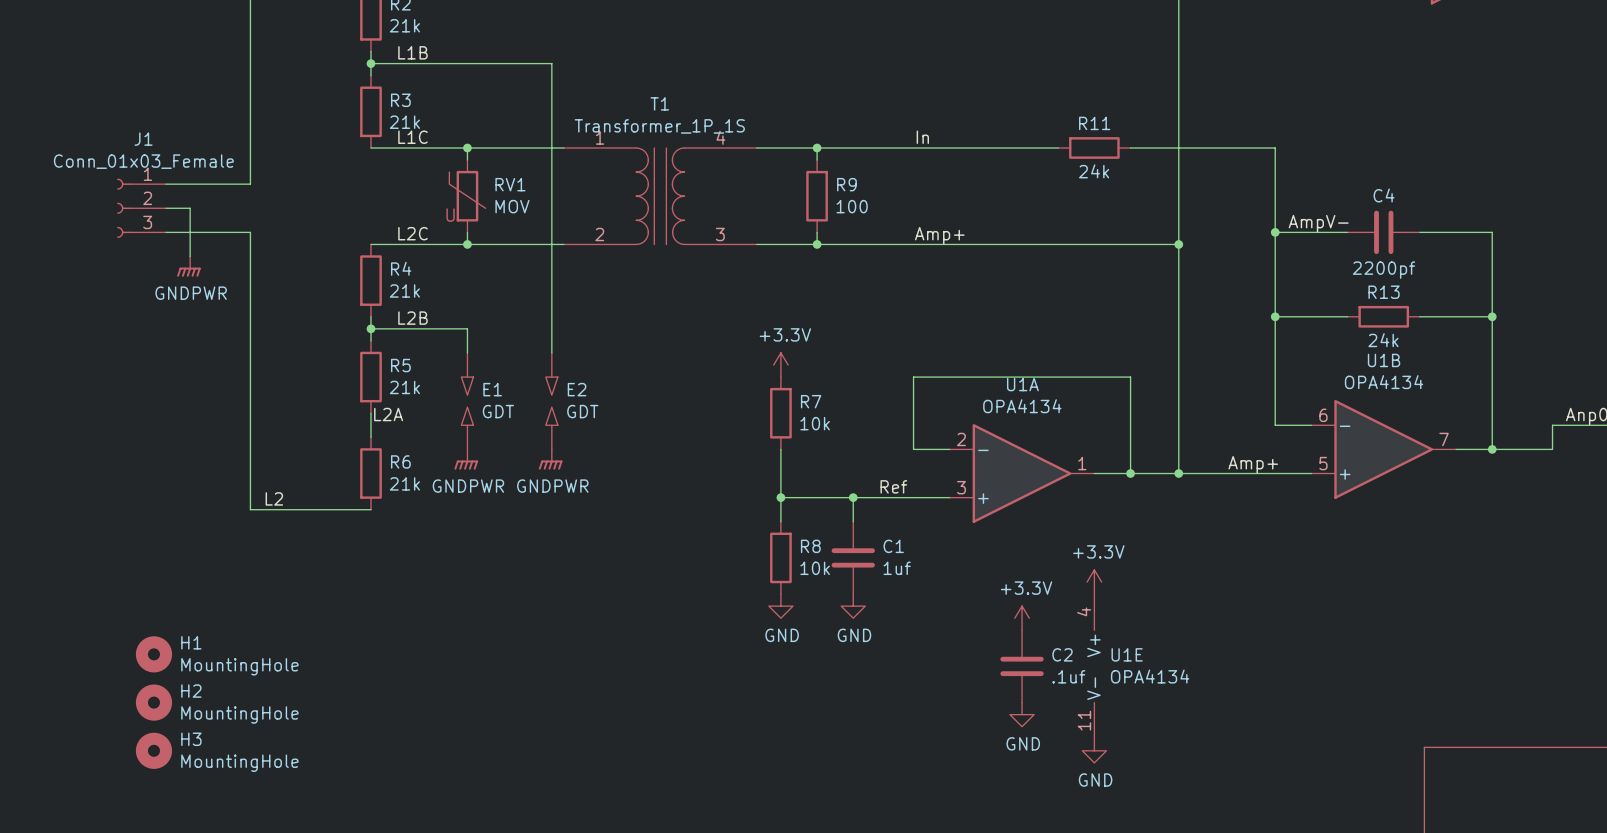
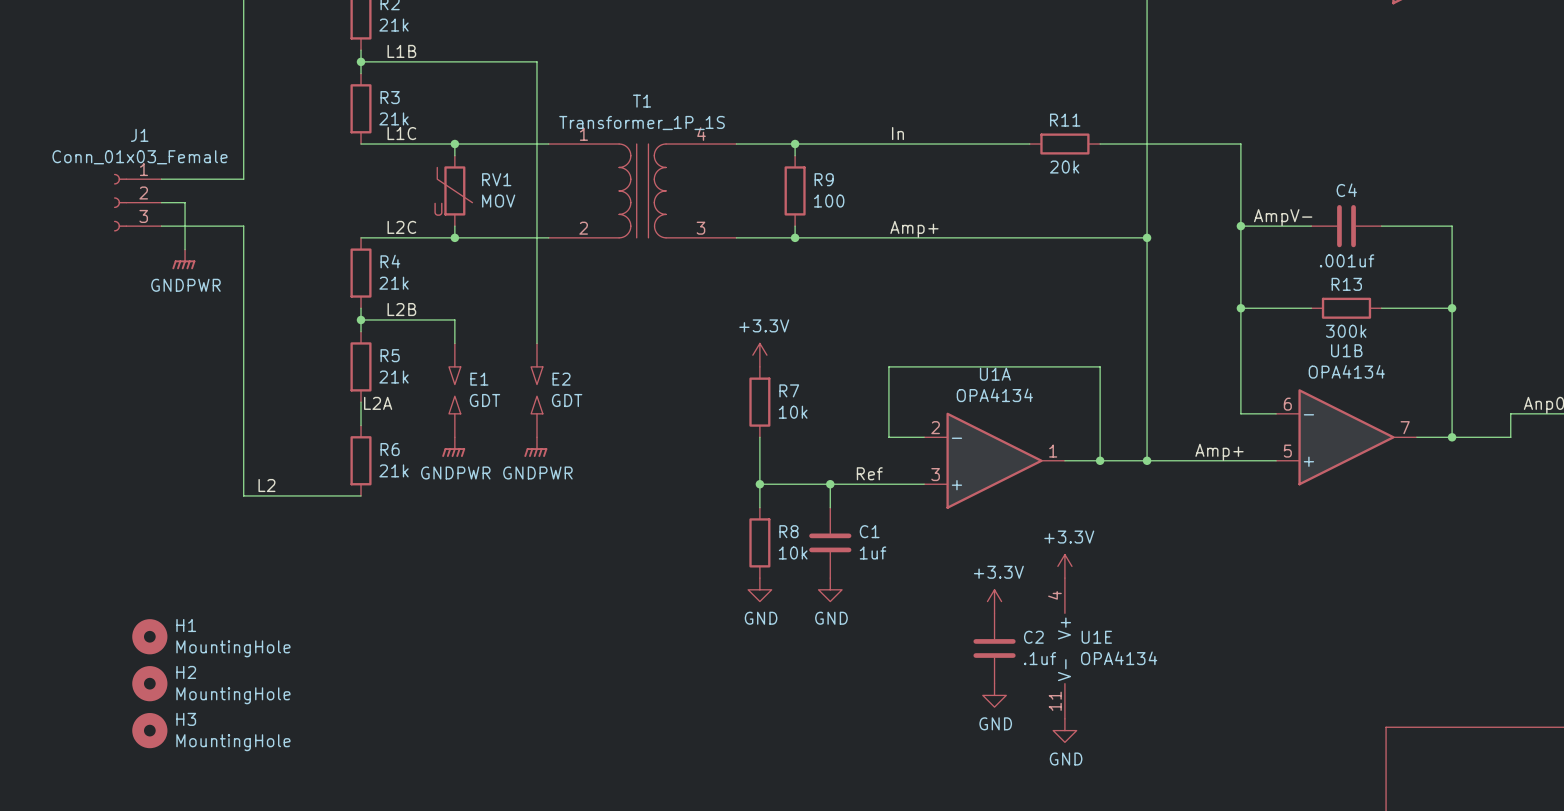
R11 value: 24k (1094, 171) -> 20k (1064, 167)
C4 value: 2200pf (1384, 270) -> .001uf (1347, 260)
R13 value: 24k (1383, 340) -> 300k (1346, 331)

